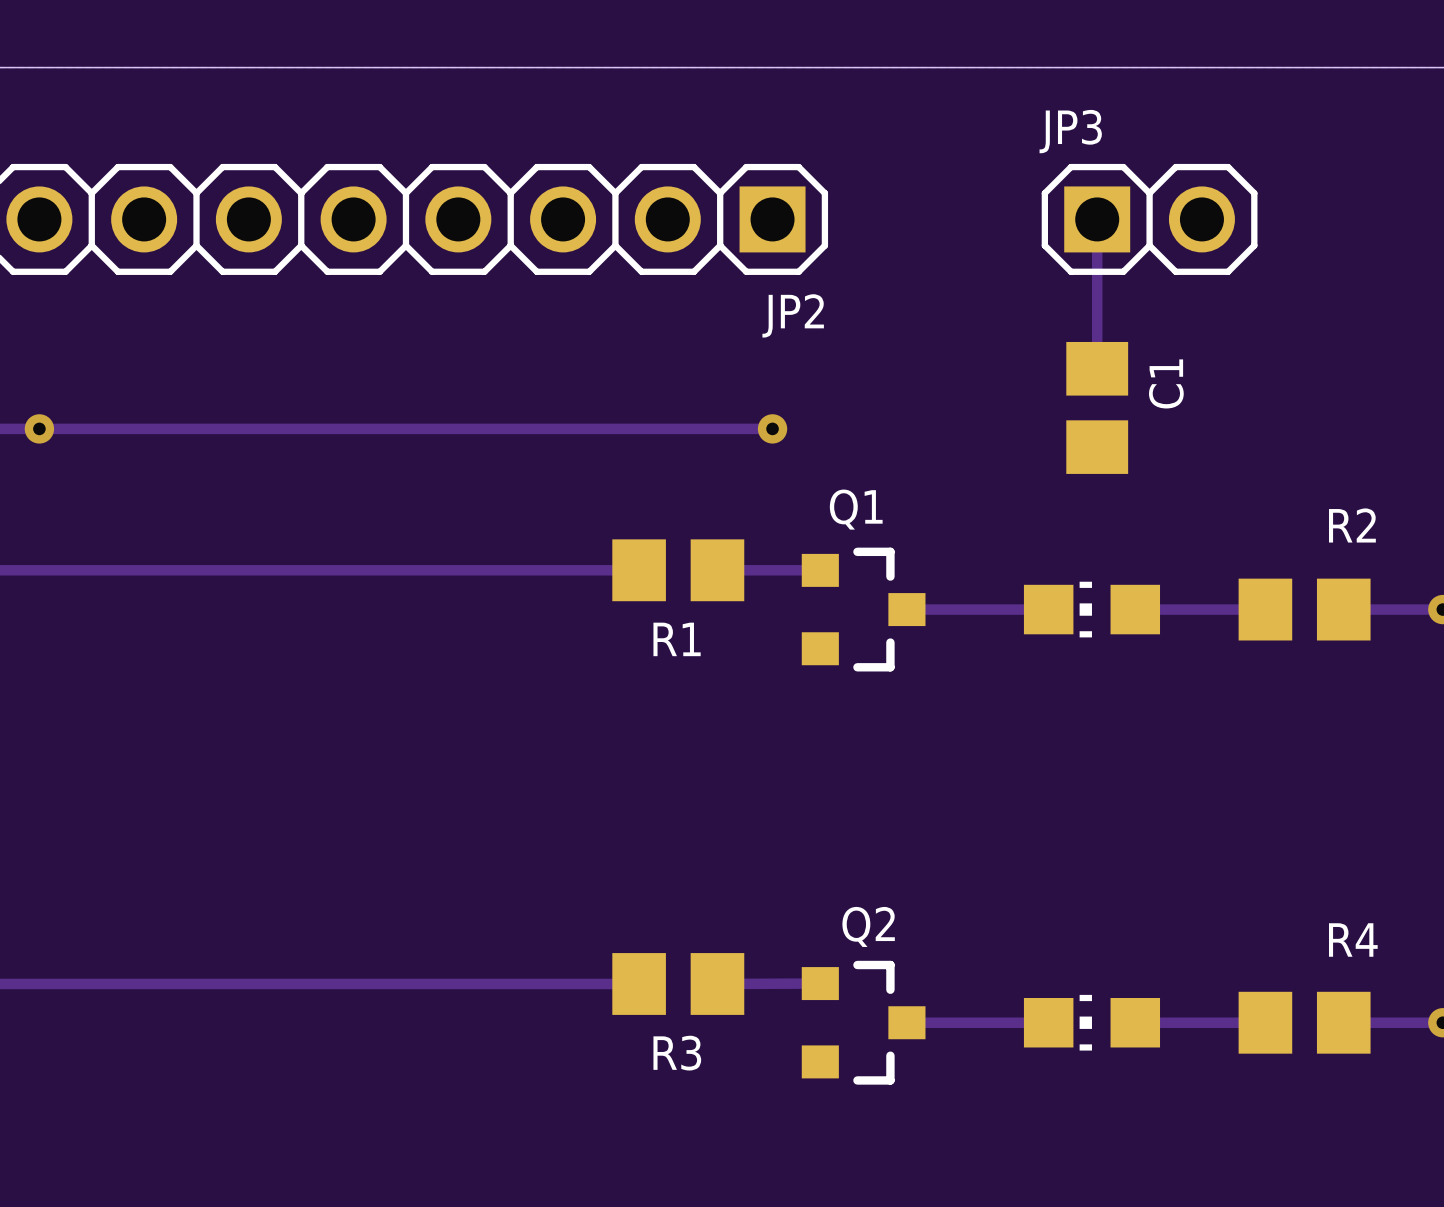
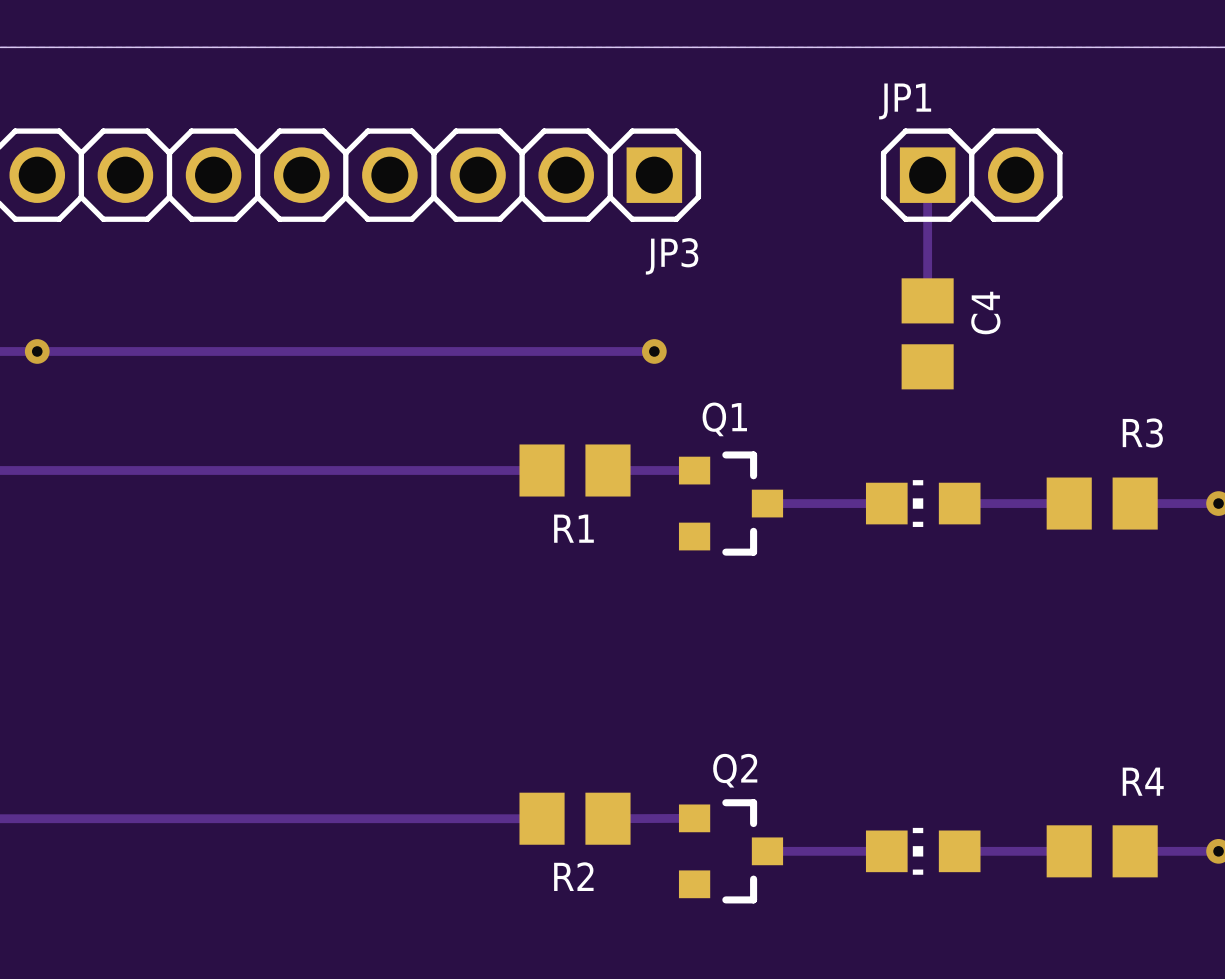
JP3 name: JP3 (1070, 131) -> JP1 (905, 101)
JP2 name: JP2 (793, 315) -> JP3 (672, 256)
C1 name: C1 (1166, 383) -> C4 (985, 313)
R2 name: R2 (1352, 525) -> R3 (1142, 433)
R3 name: R3 (677, 1053) -> R2 (573, 876)

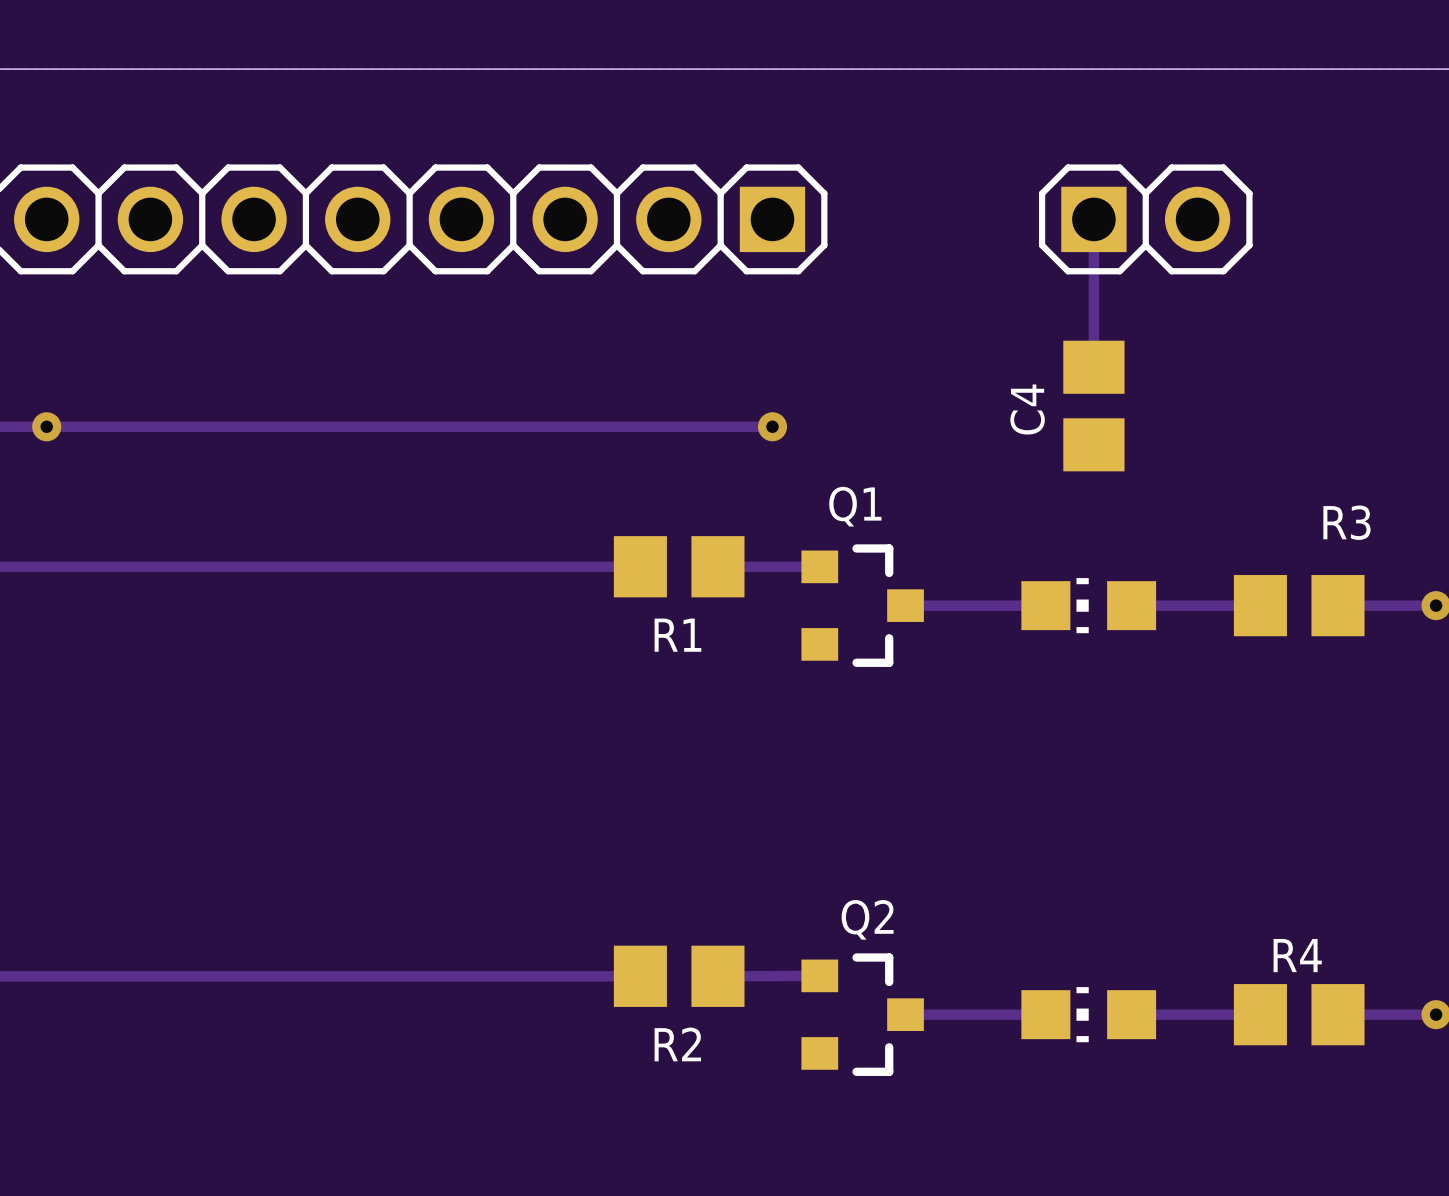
JP1 name: JP1 (905, 101) -> none
JP3 name: JP3 (672, 256) -> none
C4 name position: C4 (985, 313) -> C4 (1027, 409)
R4 name position: R4 (1143, 781) -> R4 (1297, 955)

